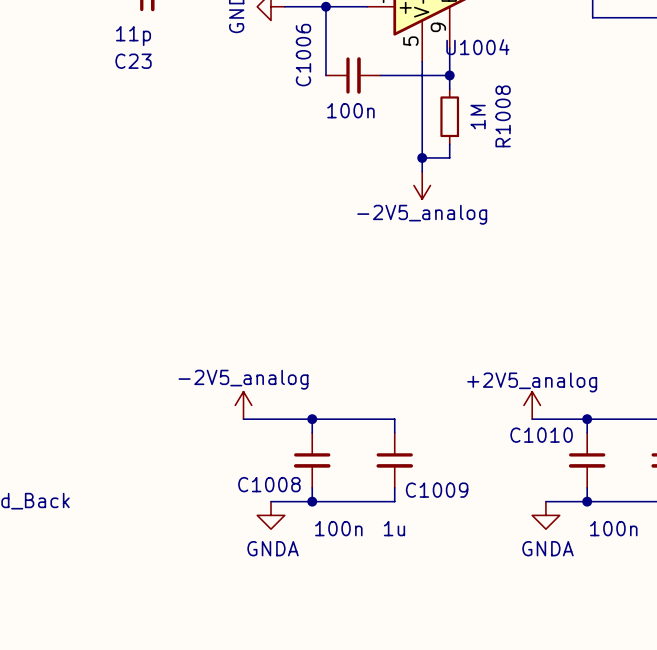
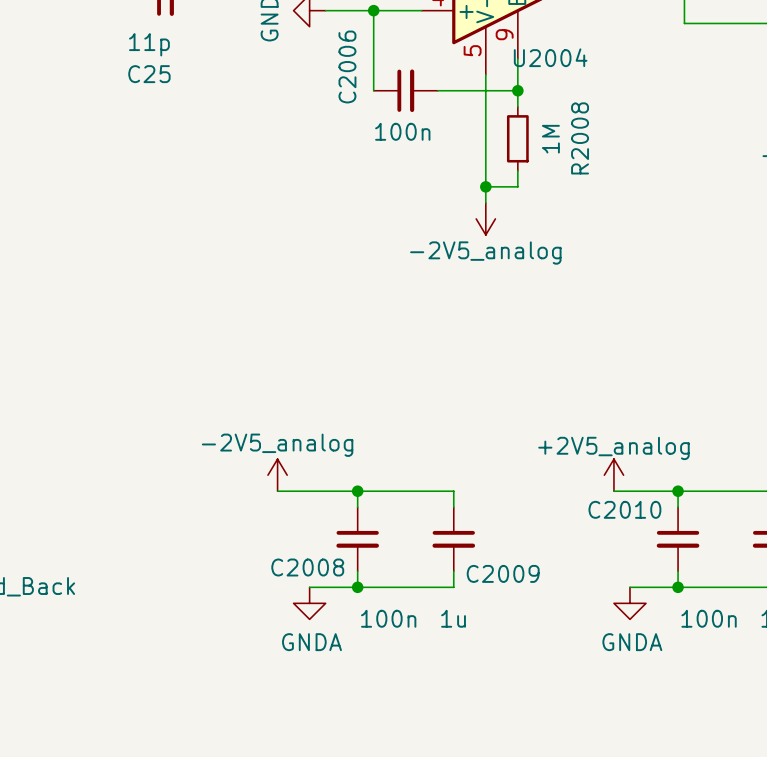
U1004 name: U1004 (477, 47) -> U2004 (550, 57)
C1006 name: C1006 (303, 55) -> C2006 (347, 66)
C23 name: C23 (133, 61) -> C25 (149, 74)
R1008 name: R1008 (503, 116) -> R2008 (580, 138)
C1010 name: C1010 (541, 435) -> C2010 (624, 509)
C1008 name: C1008 (269, 484) -> C2008 (307, 567)
C1009 name: C1009 (437, 490) -> C2009 (503, 573)

